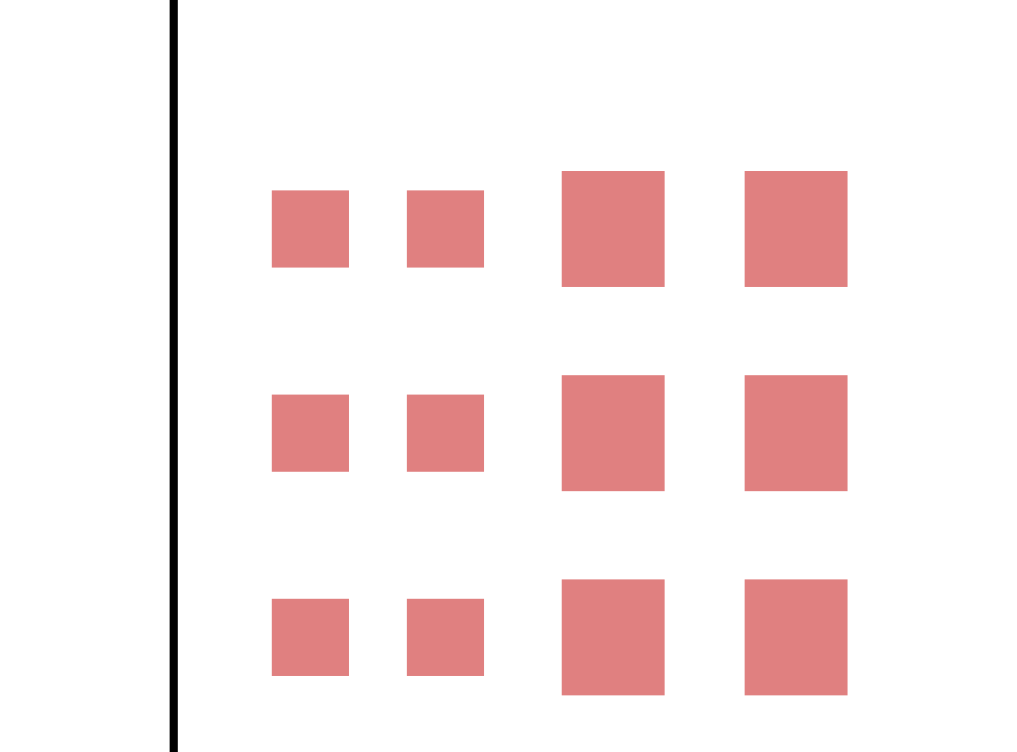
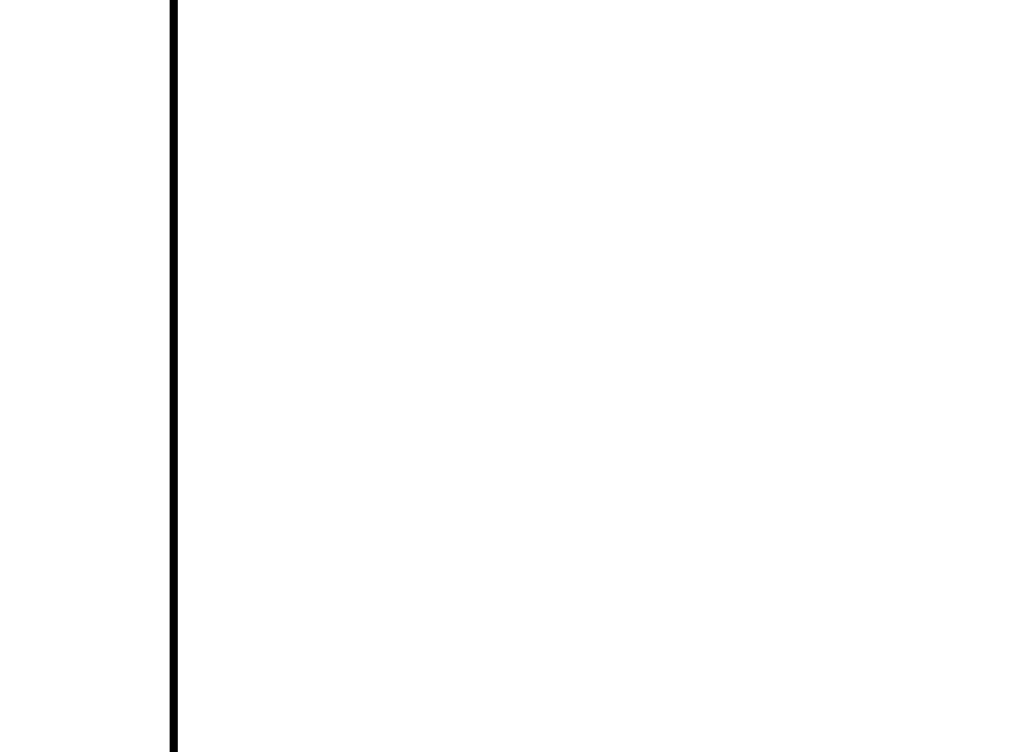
part: (377, 228) -> none
part: (704, 228) -> none
part: (377, 433) -> none
part: (704, 433) -> none
part: (377, 637) -> none
part: (704, 637) -> none

